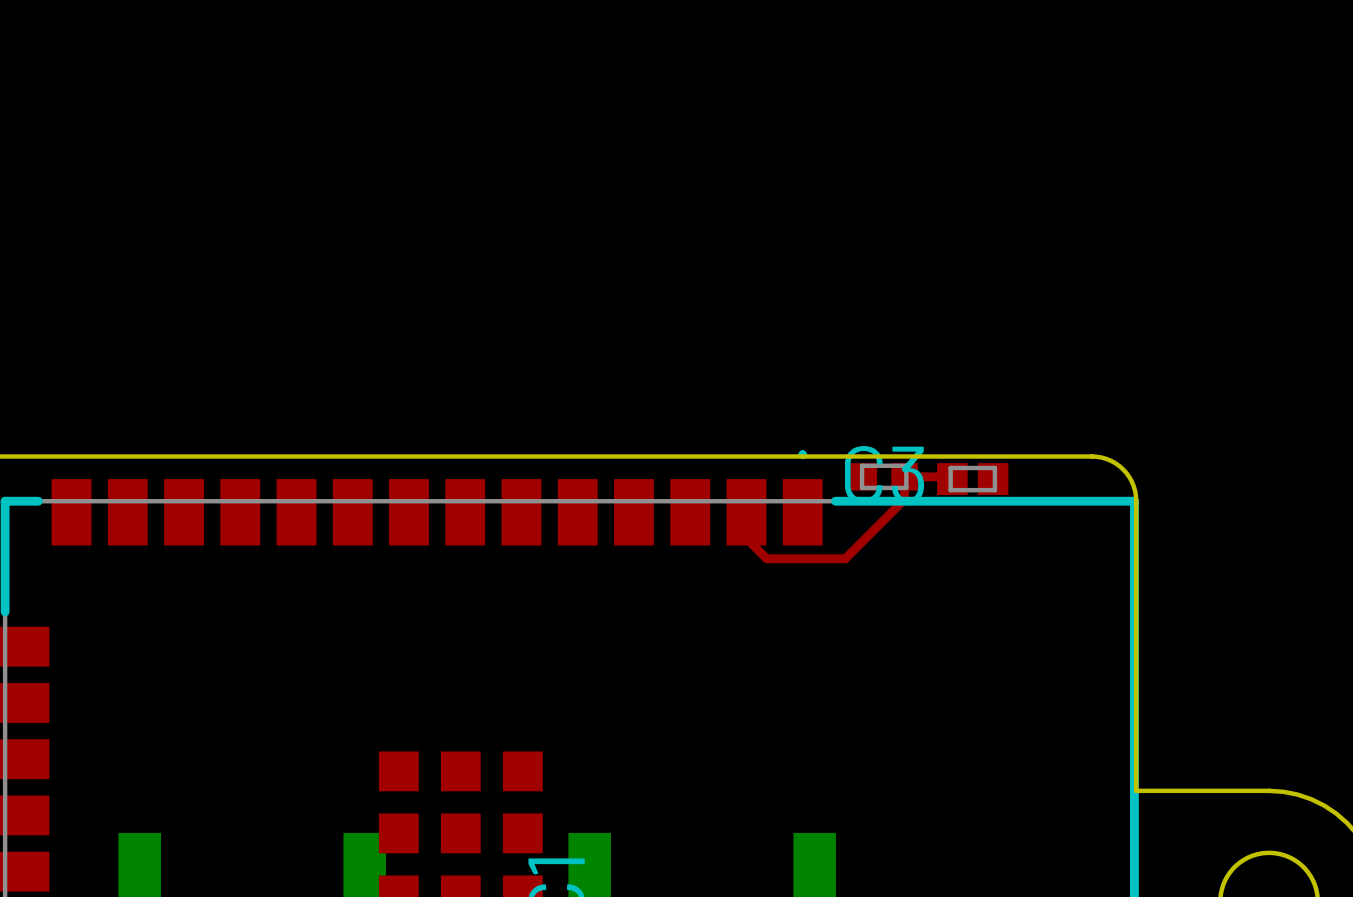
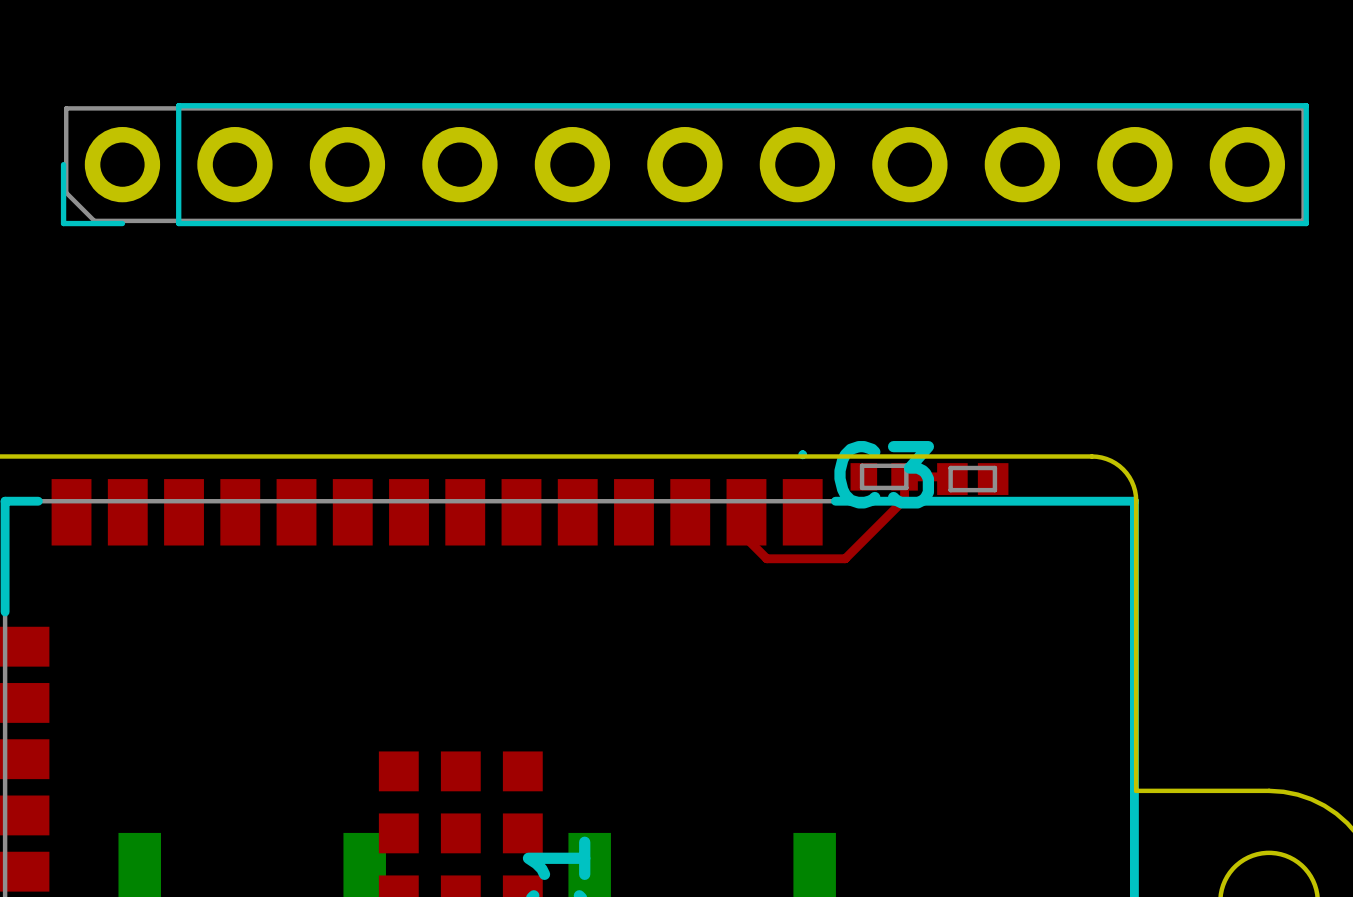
part: none -> (684, 164)

